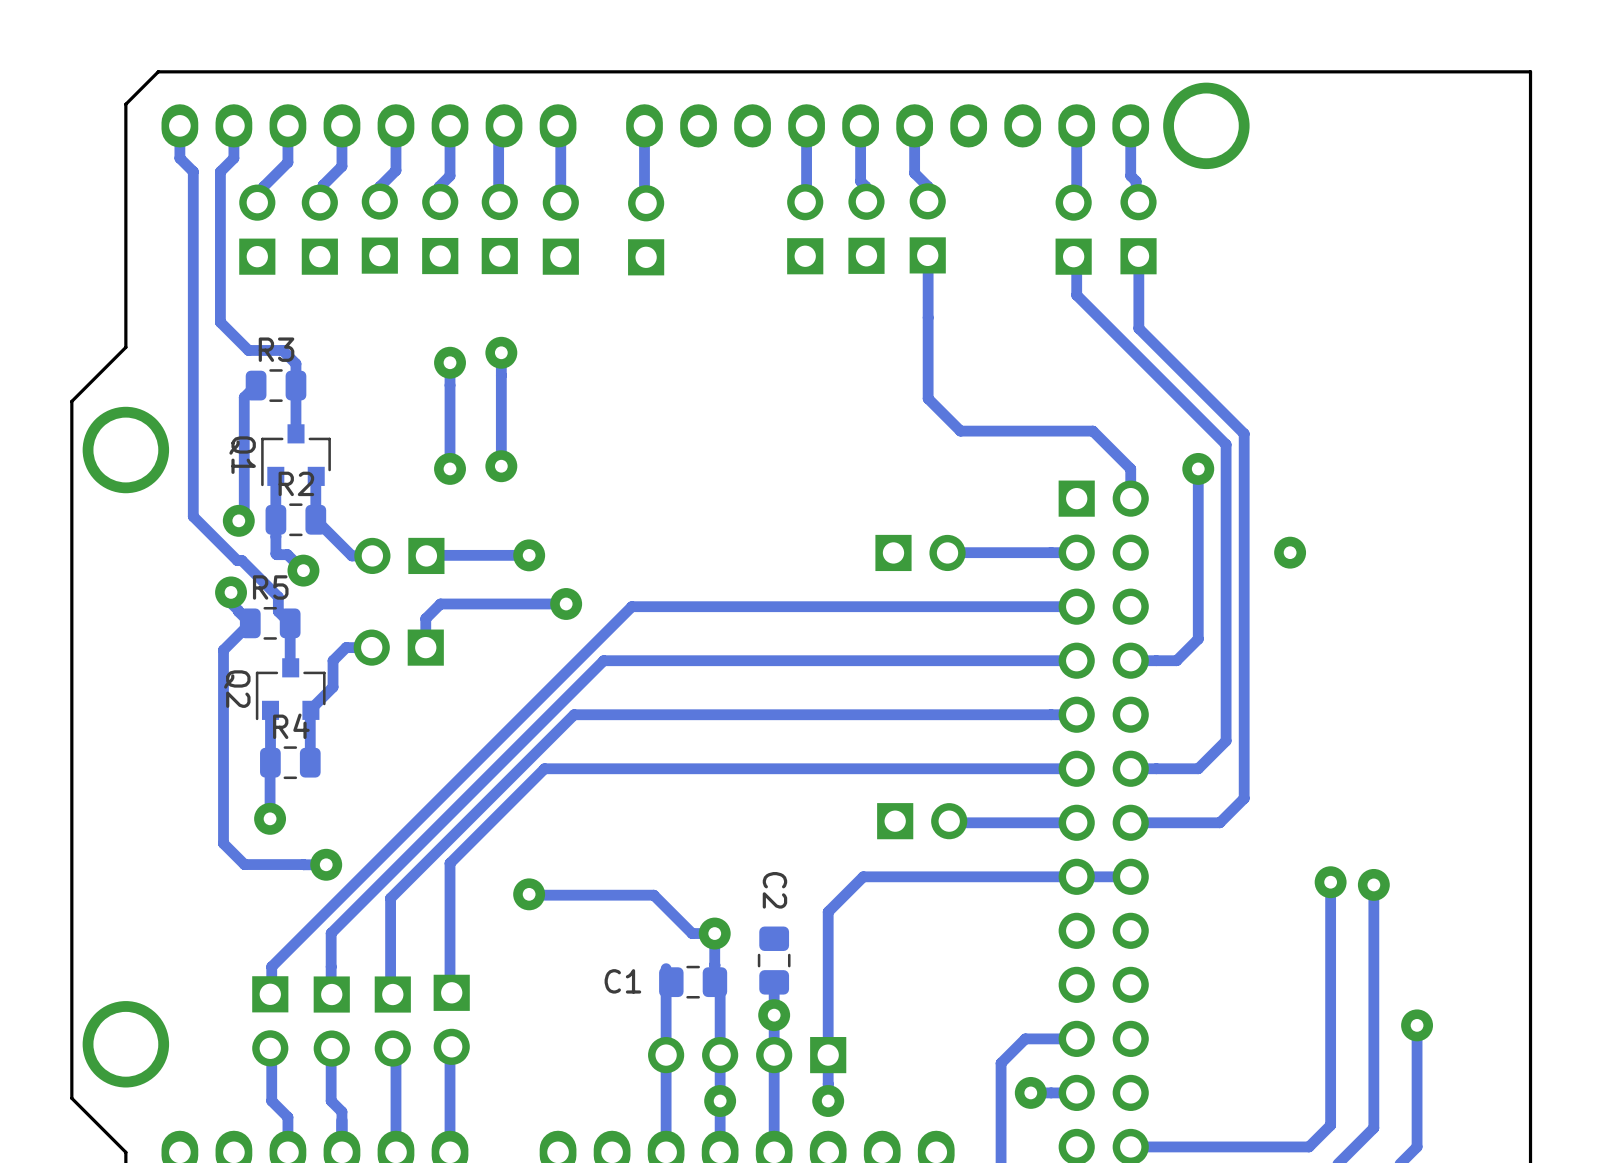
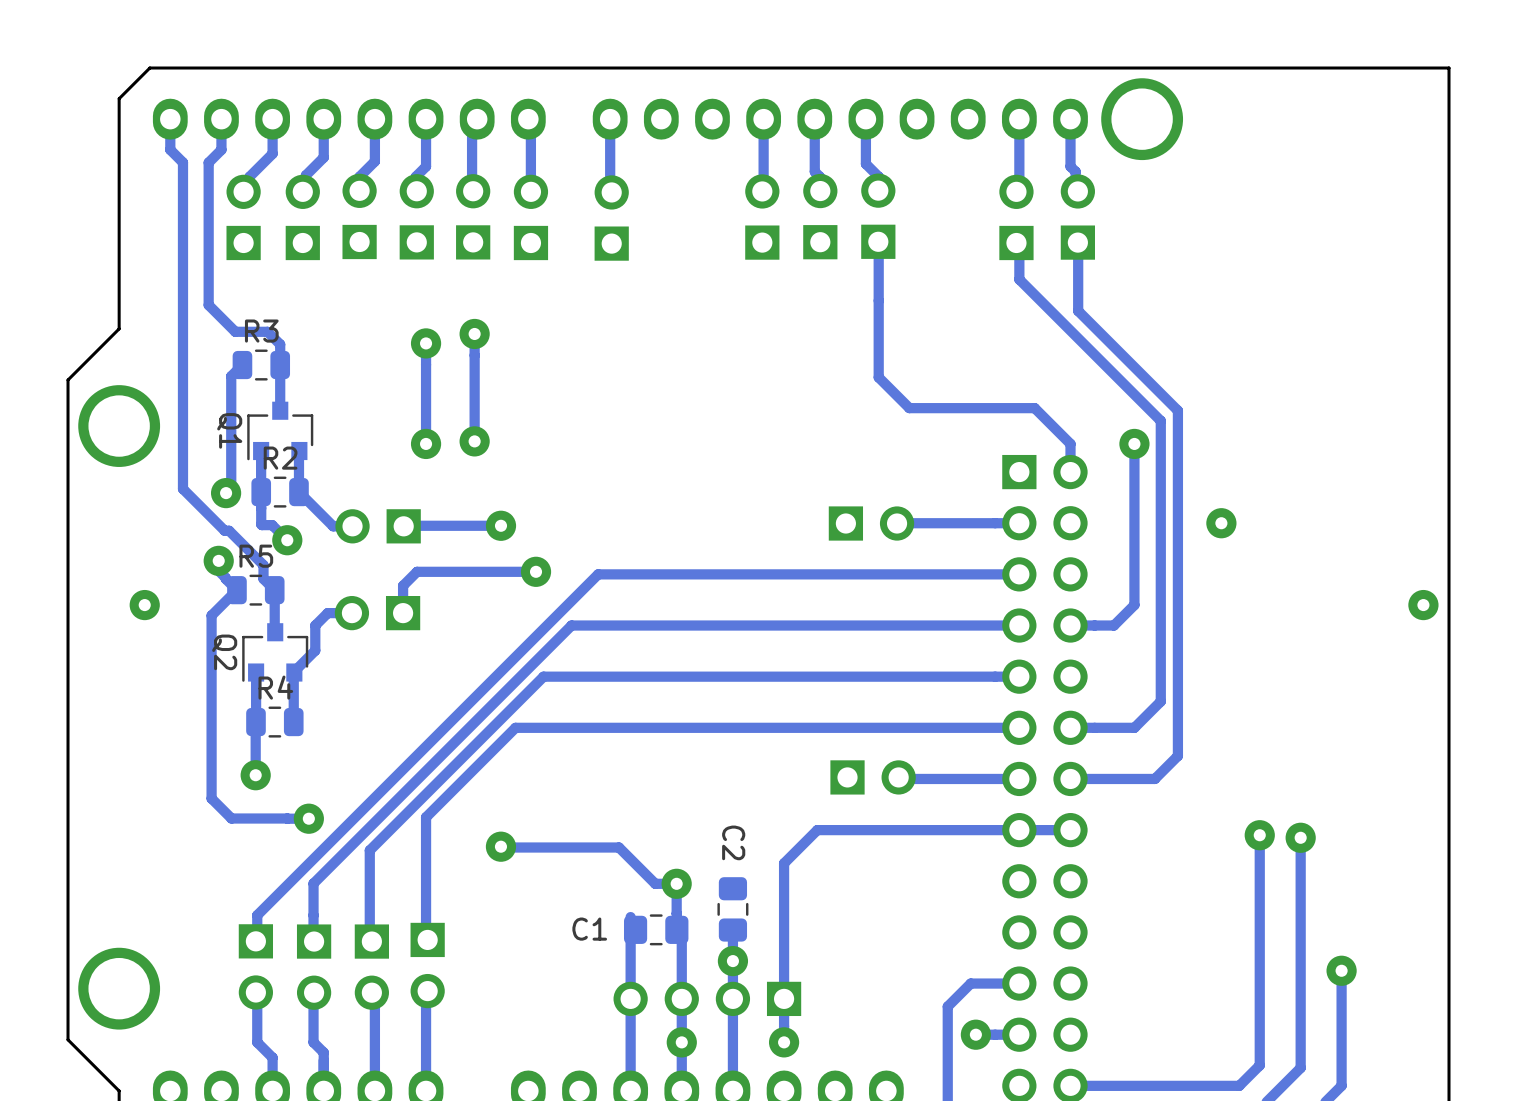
via: none -> (144, 605)
via: none -> (1423, 605)

